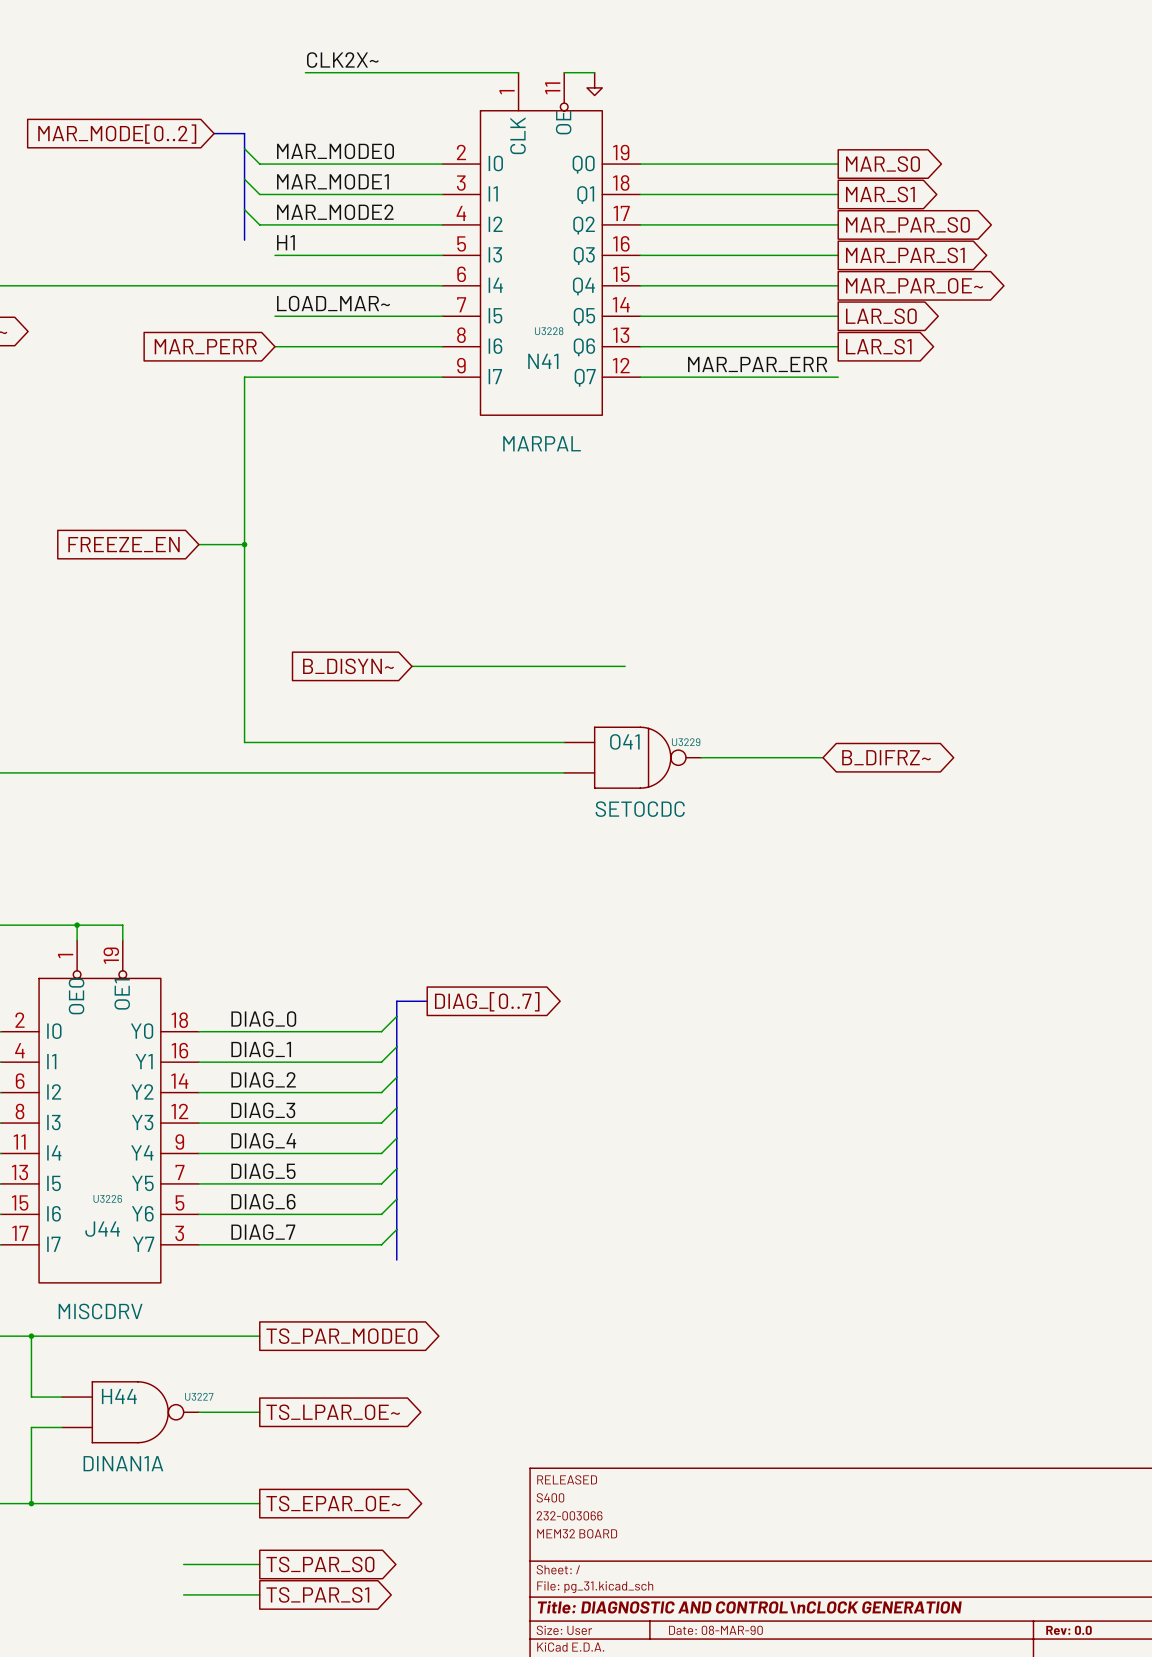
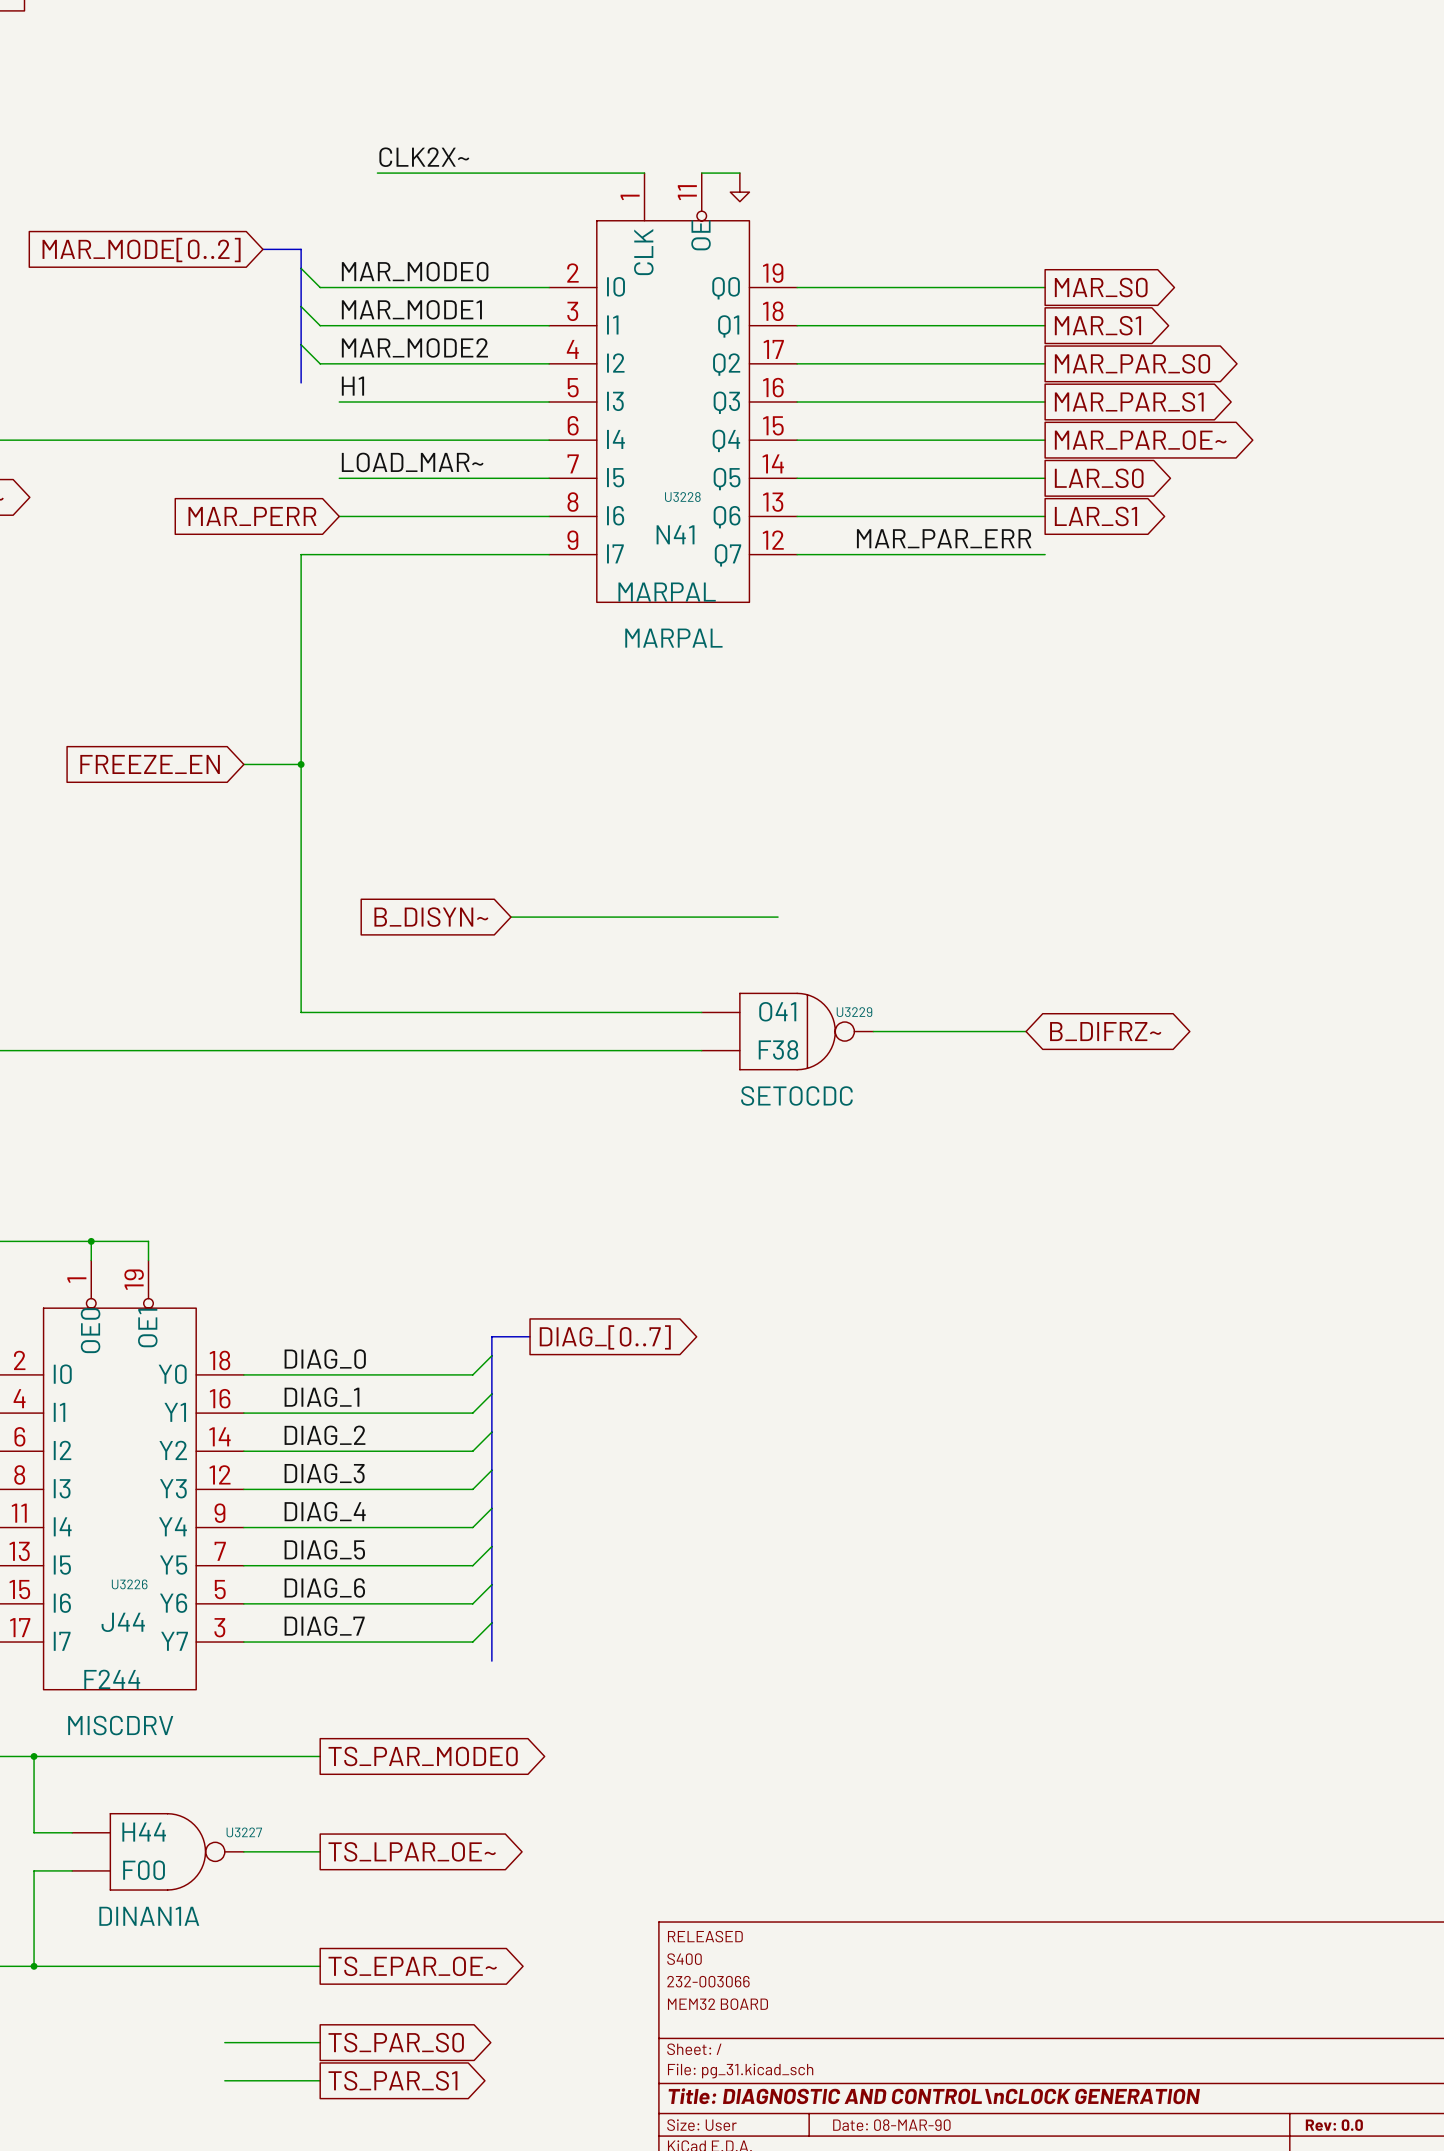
U3228 value: none -> MARPAL (667, 592)
U3229 value: none -> F38 (778, 1049)
U3226 value: none -> F244 (112, 1679)
U3227 value: none -> F00 (144, 1870)

